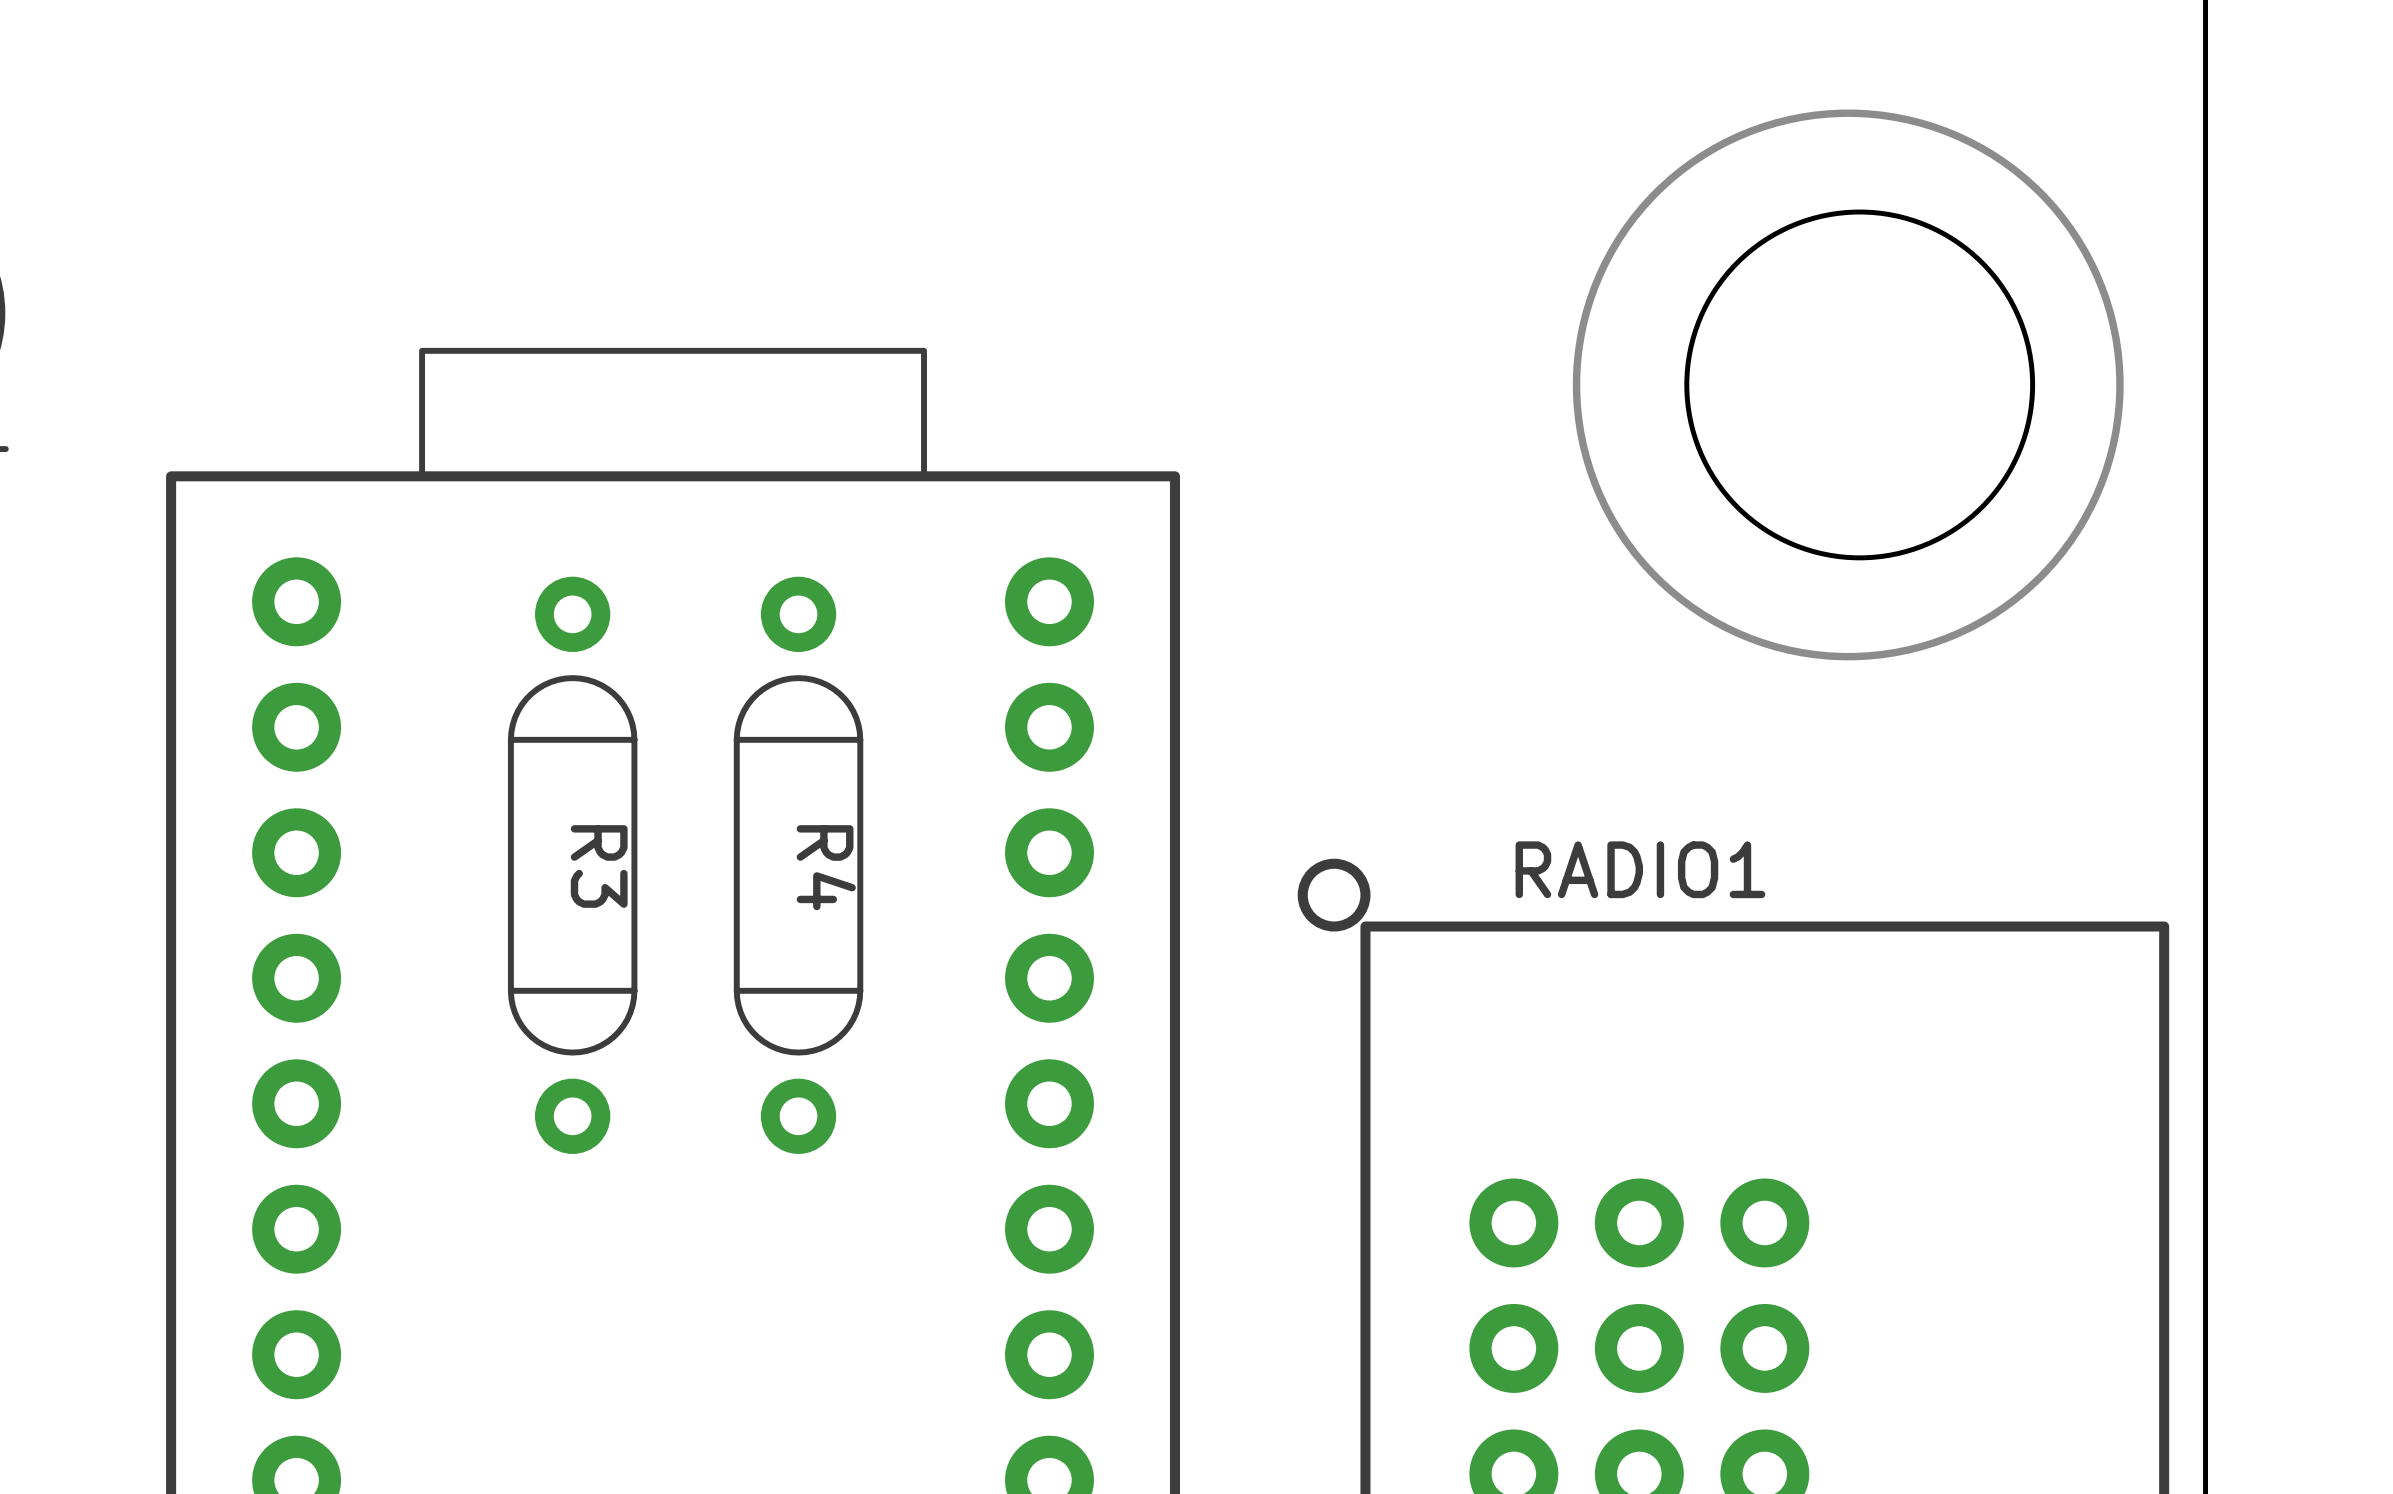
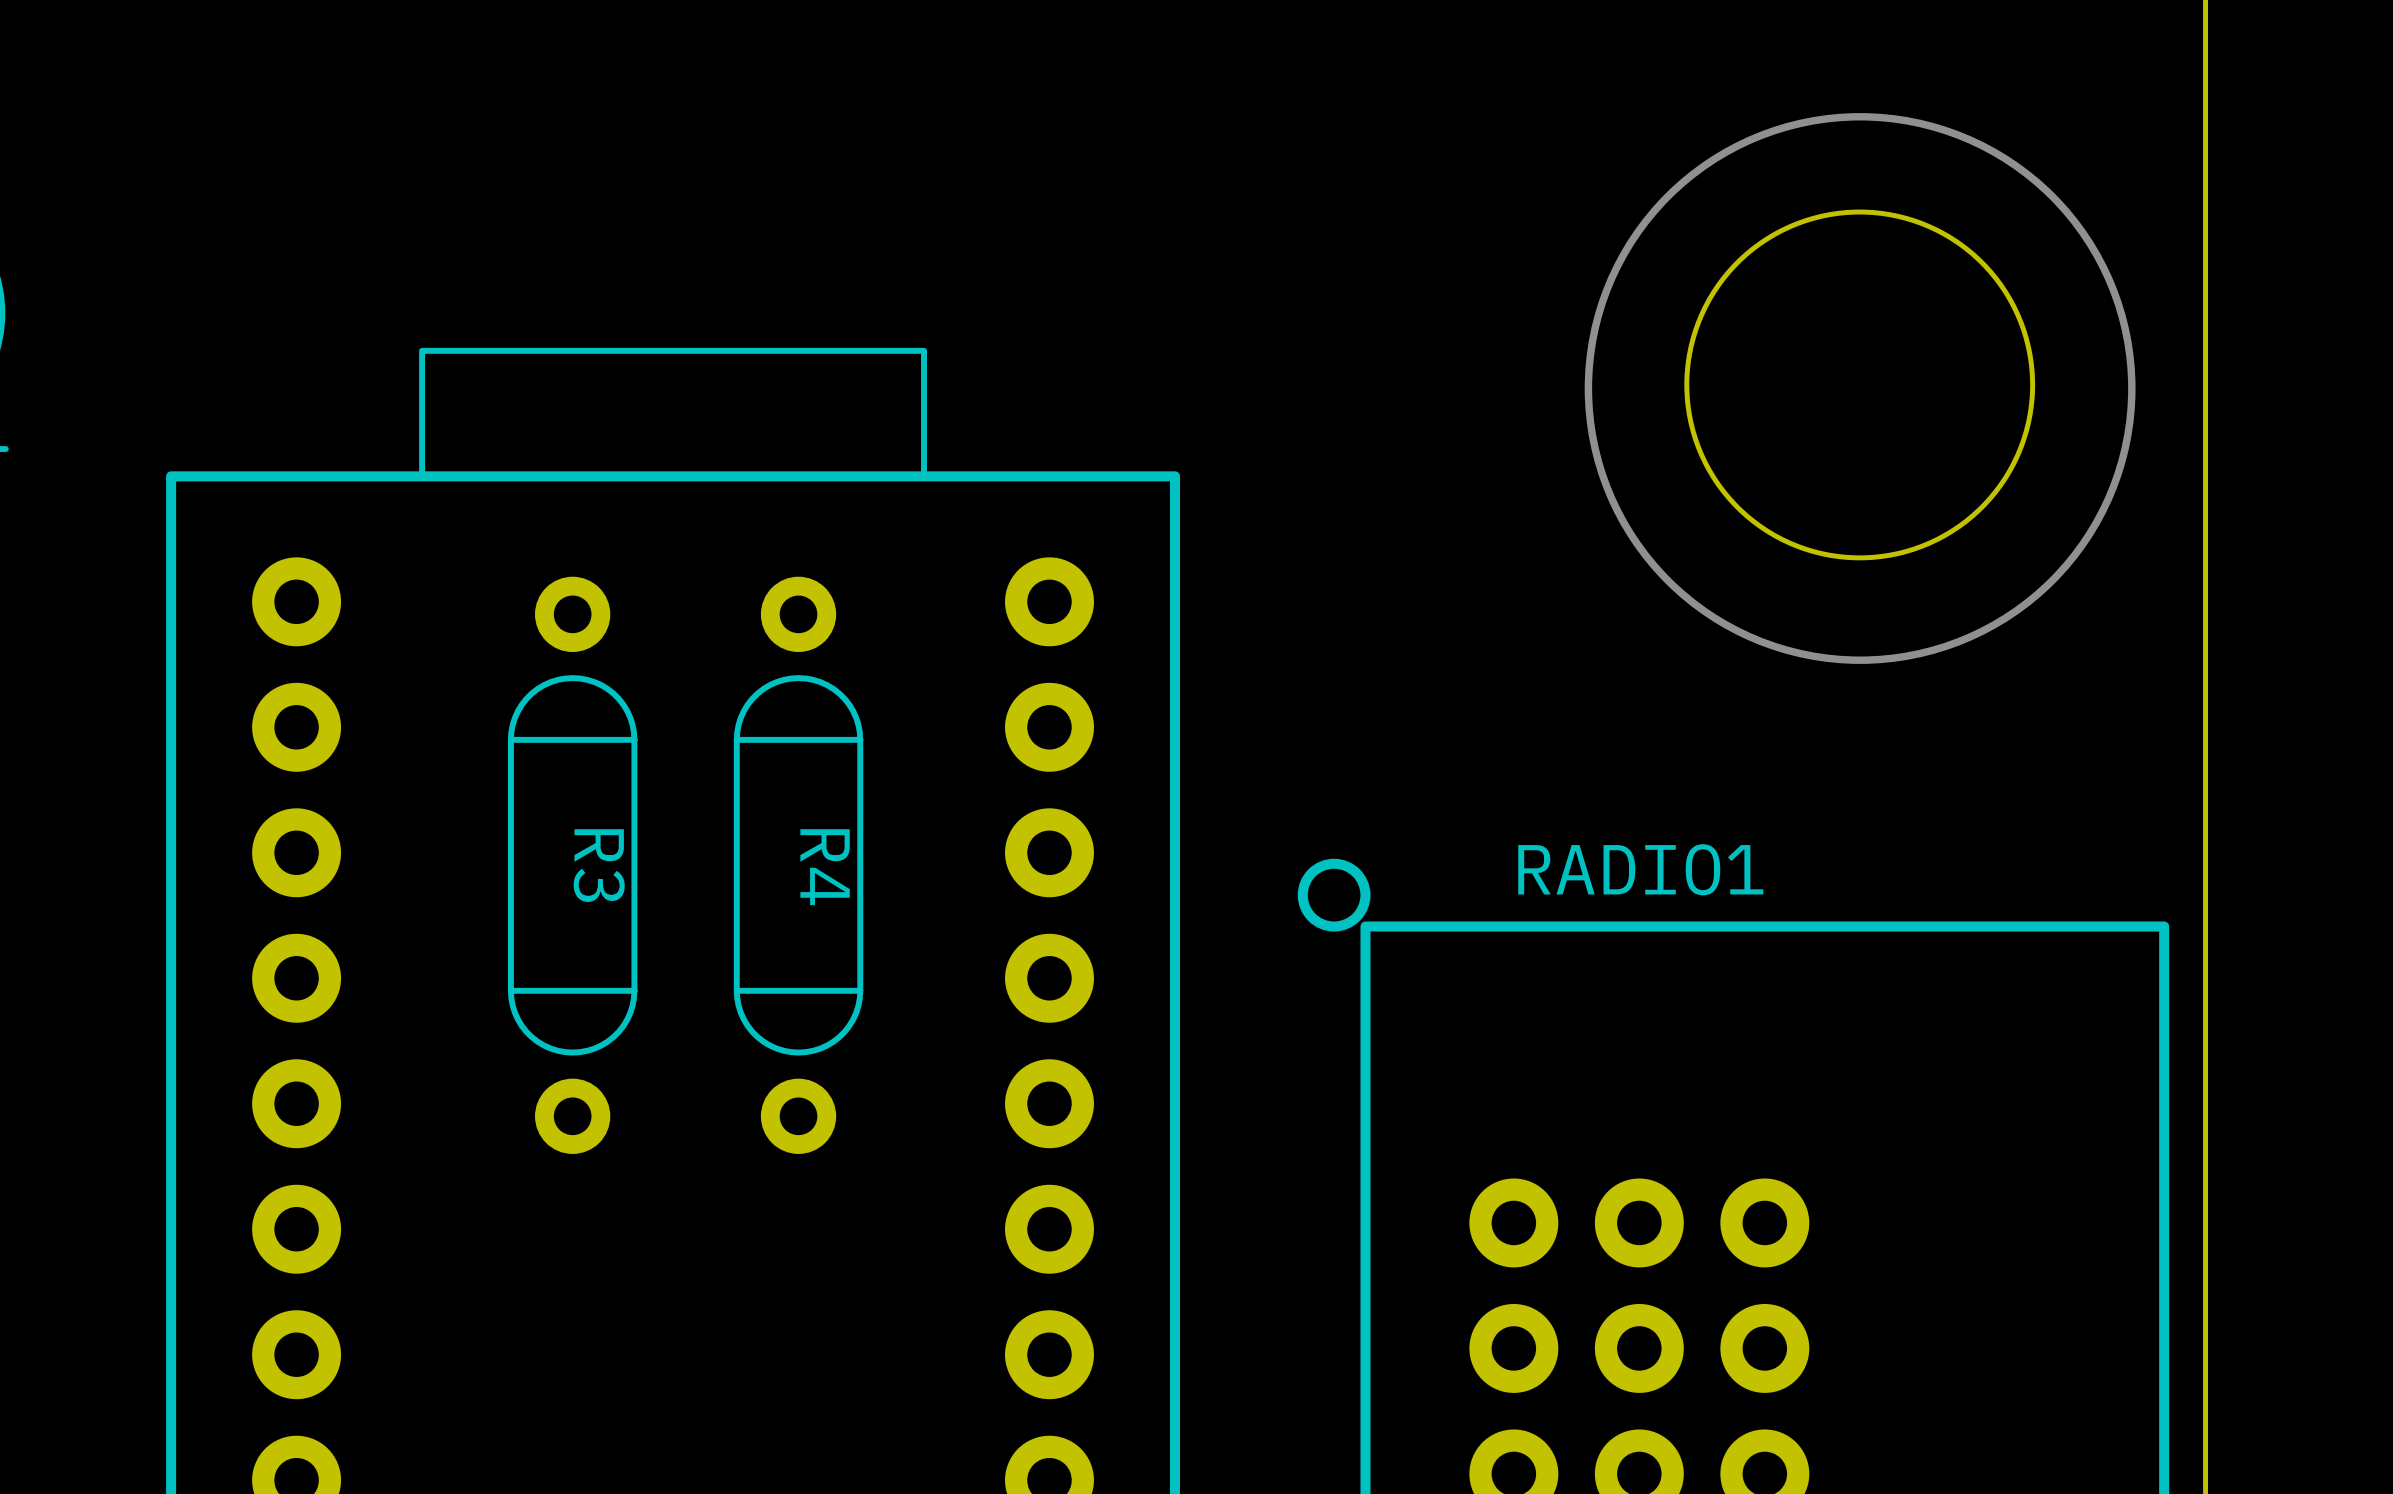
drawing position: (1848, 384) -> (1860, 388)

